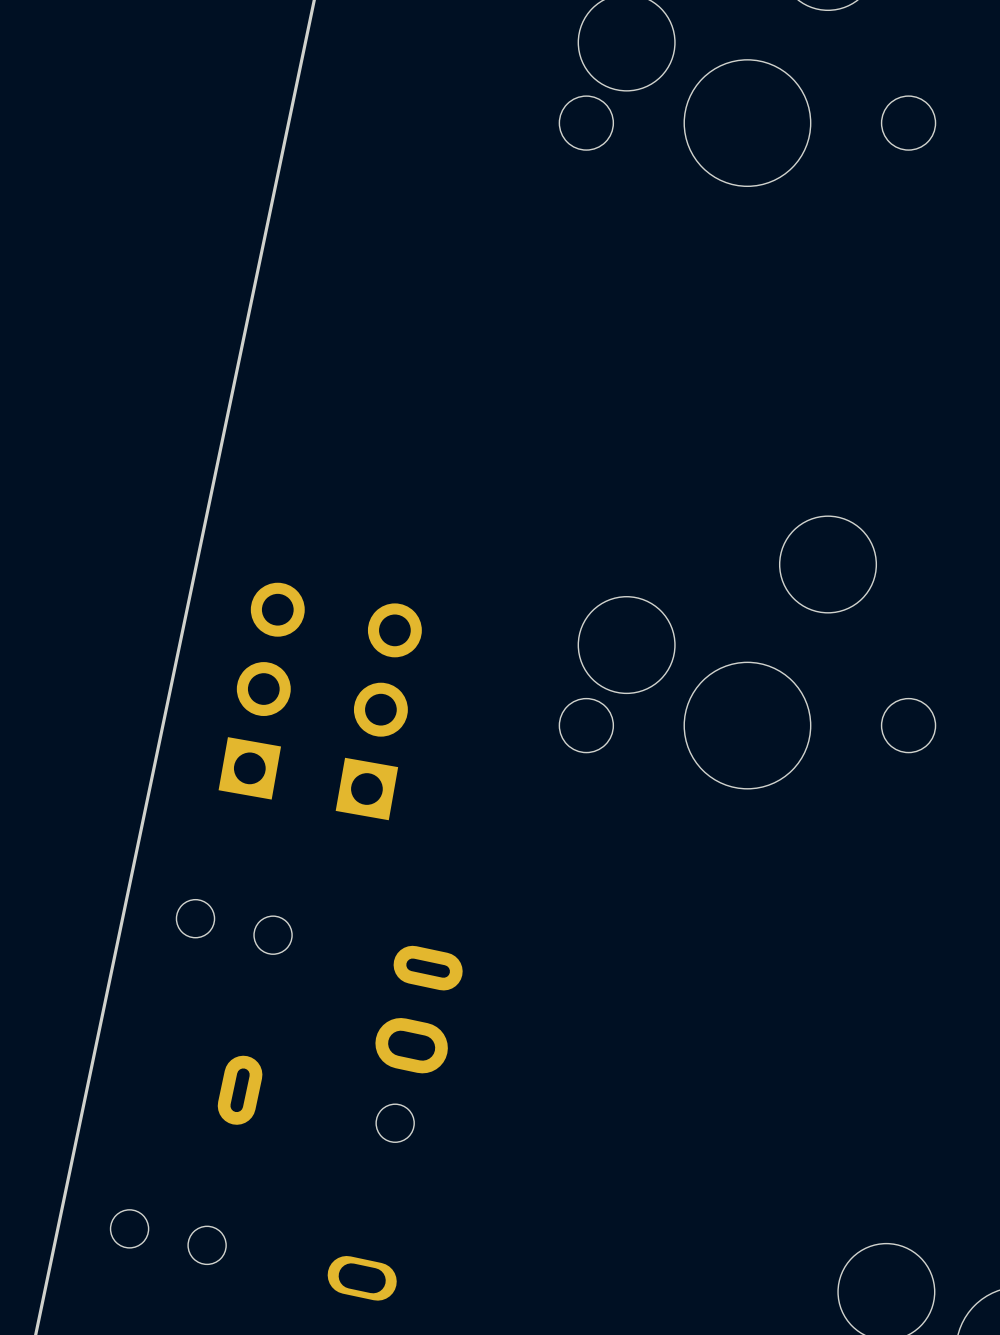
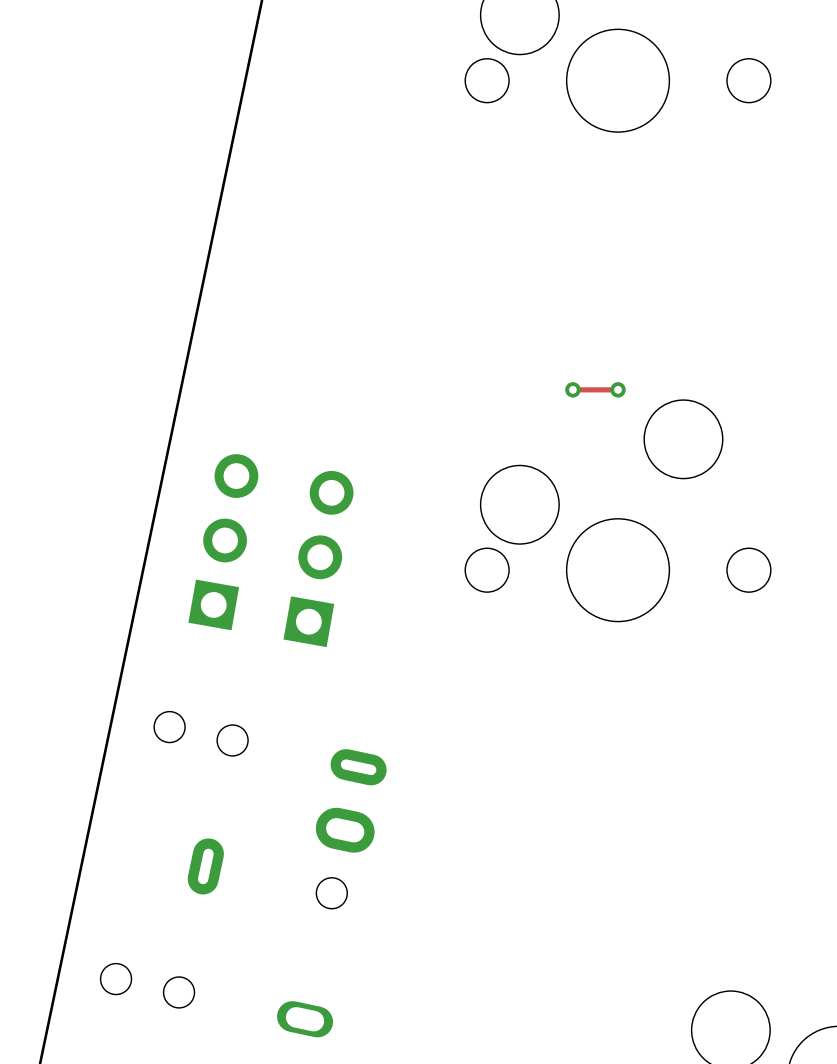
track: none -> (572, 389) (618, 389)
via: none -> (572, 389)
via: none -> (618, 389)

